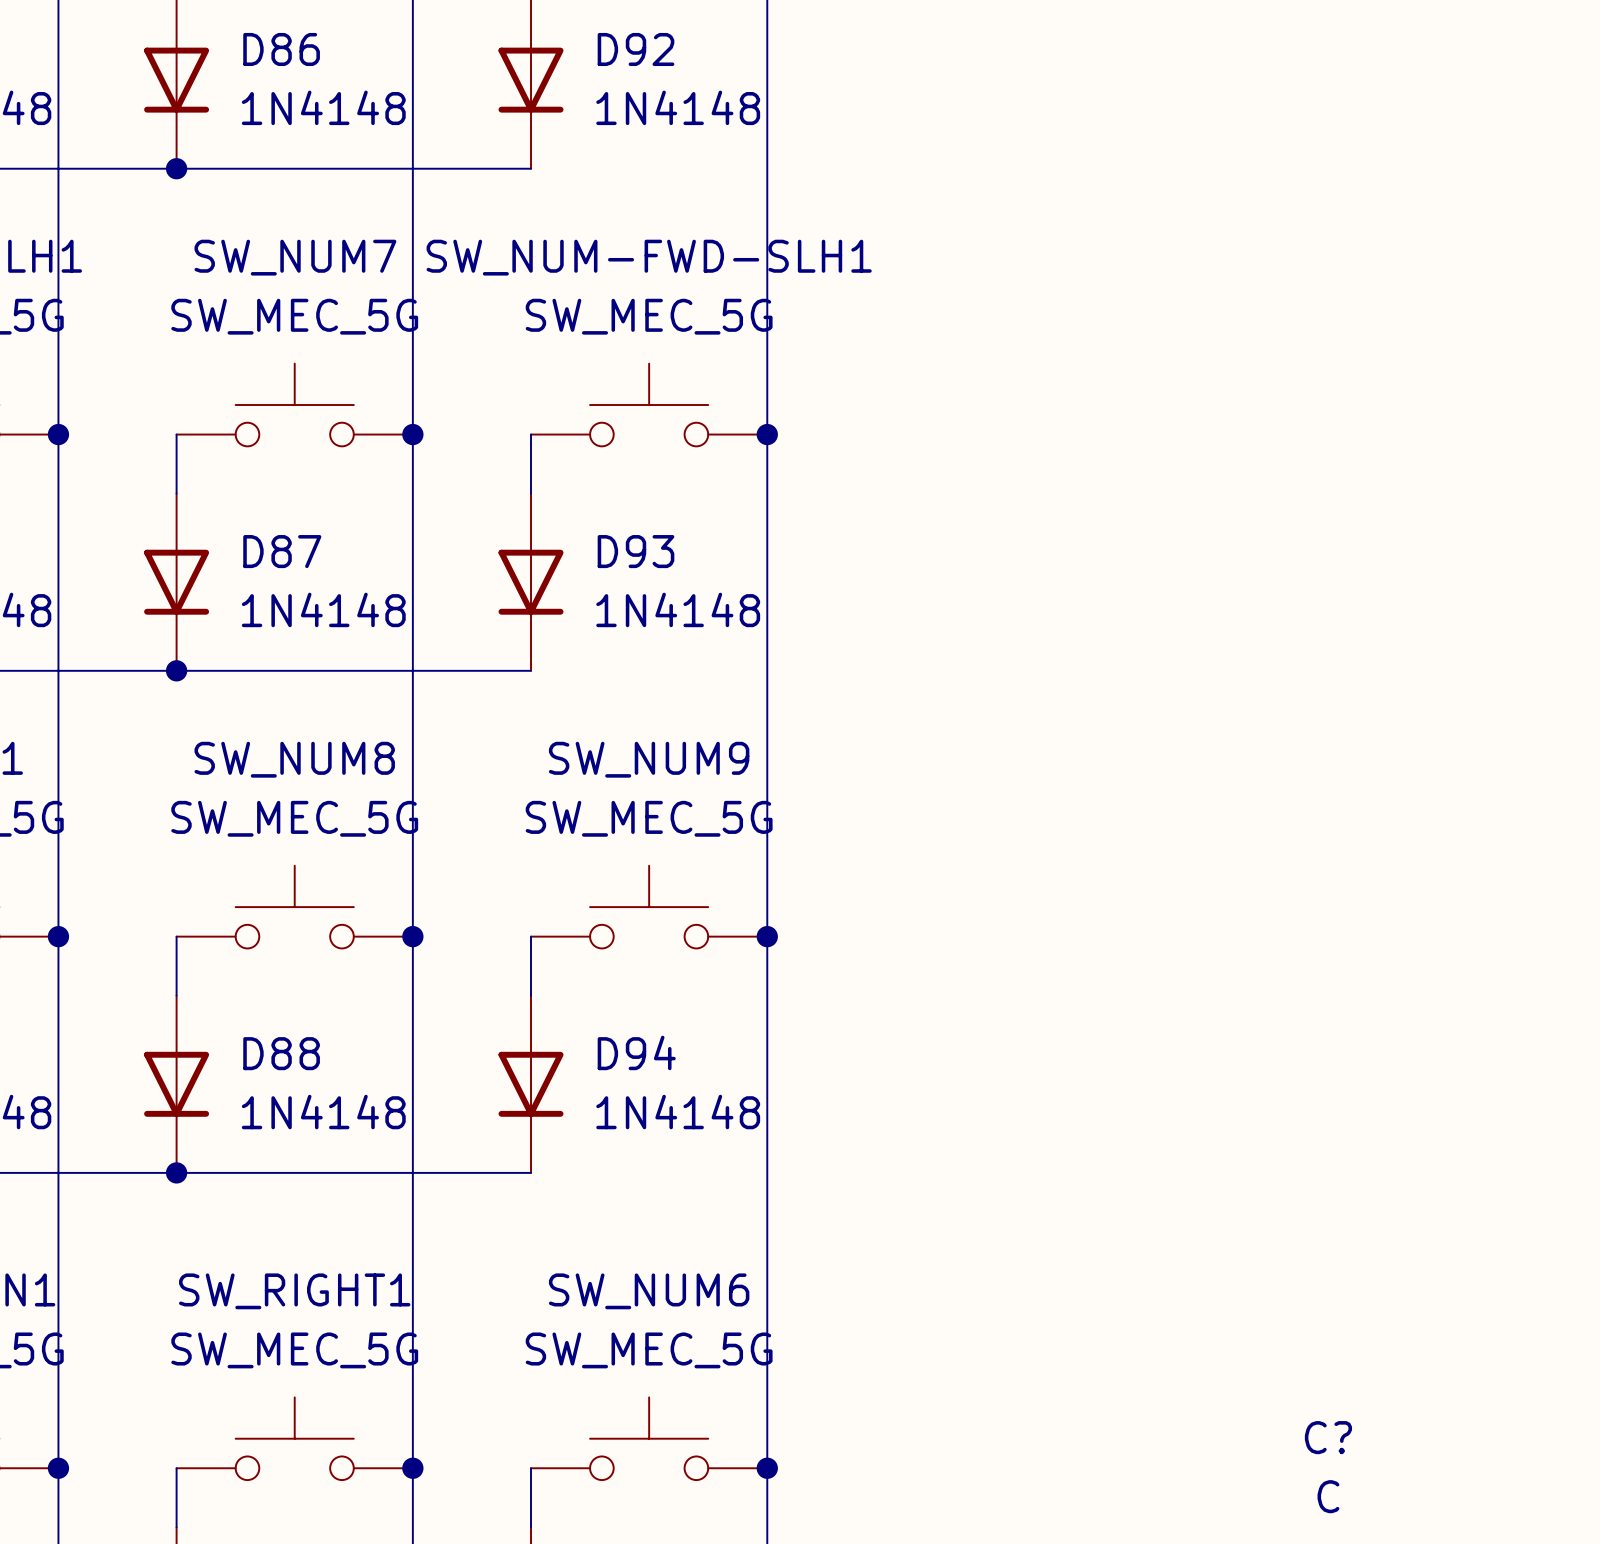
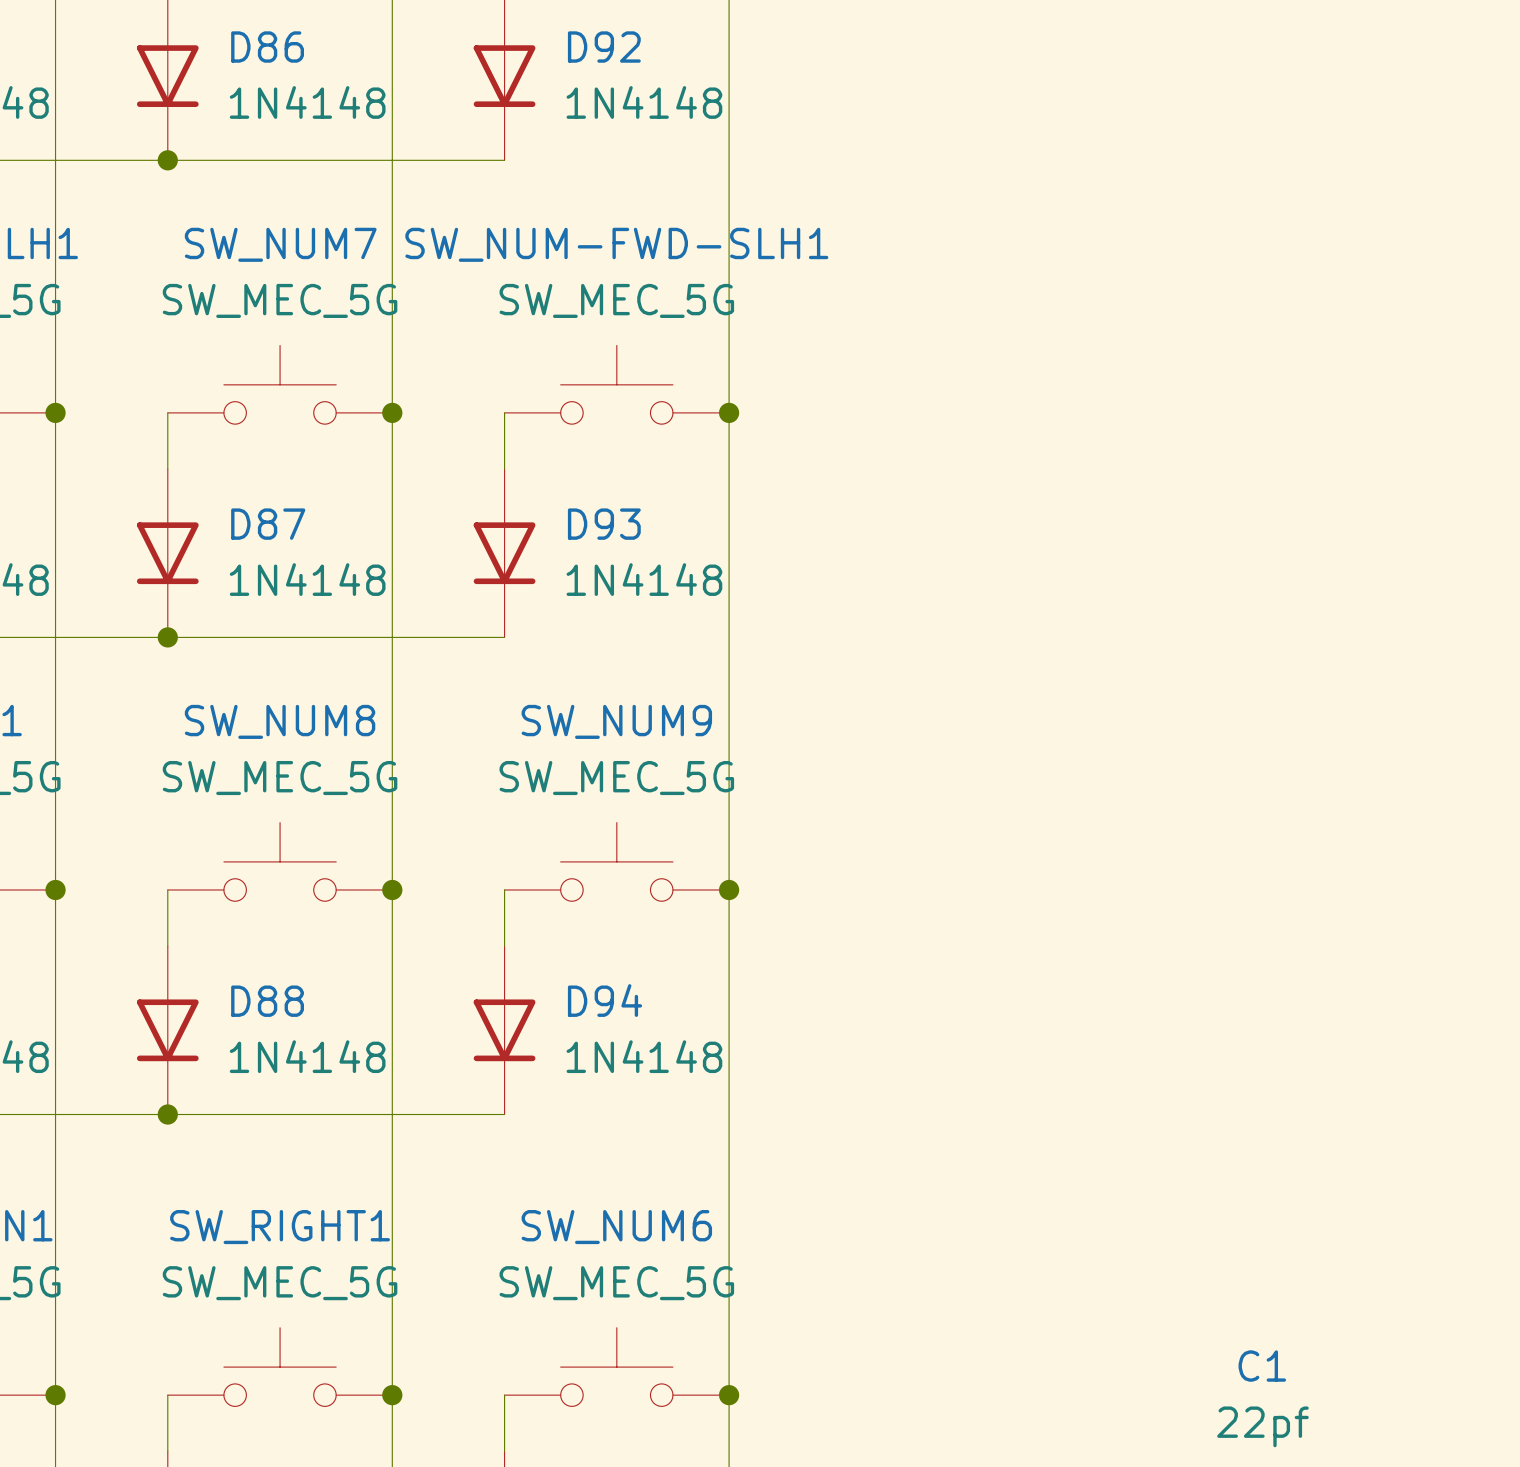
C? name: C? (1328, 1437) -> C1 (1262, 1366)
C? value: C (1328, 1496) -> 22pf (1262, 1426)

